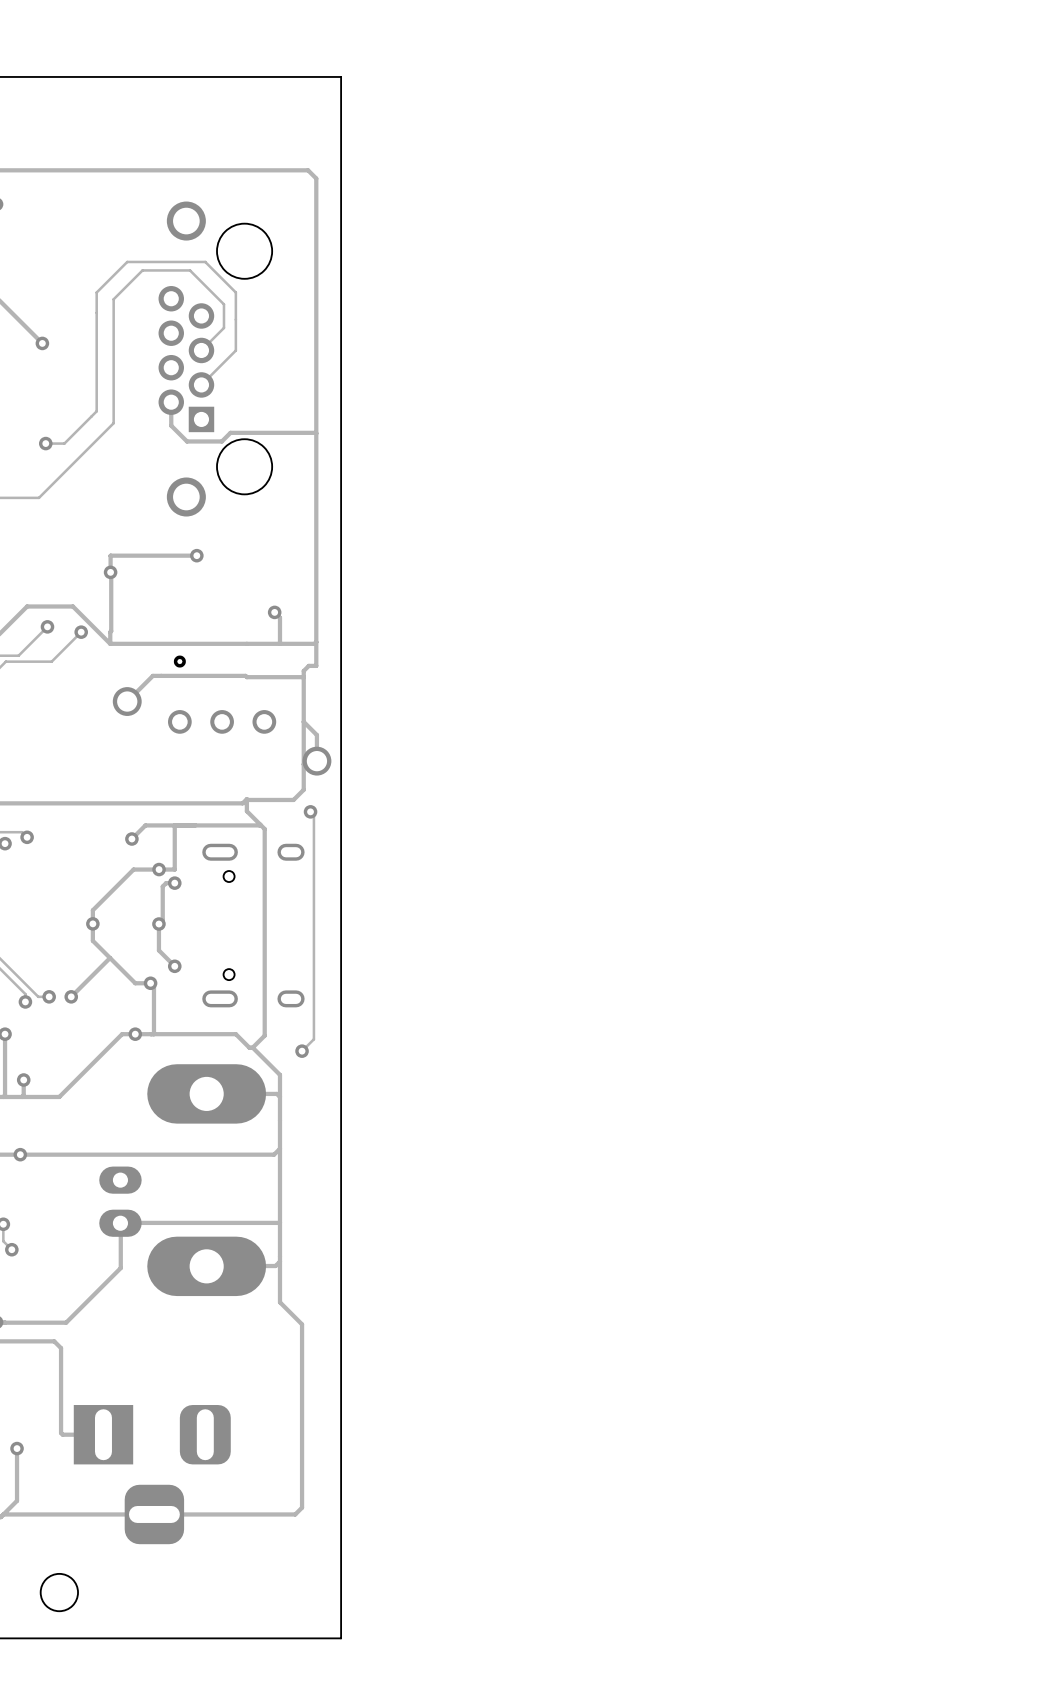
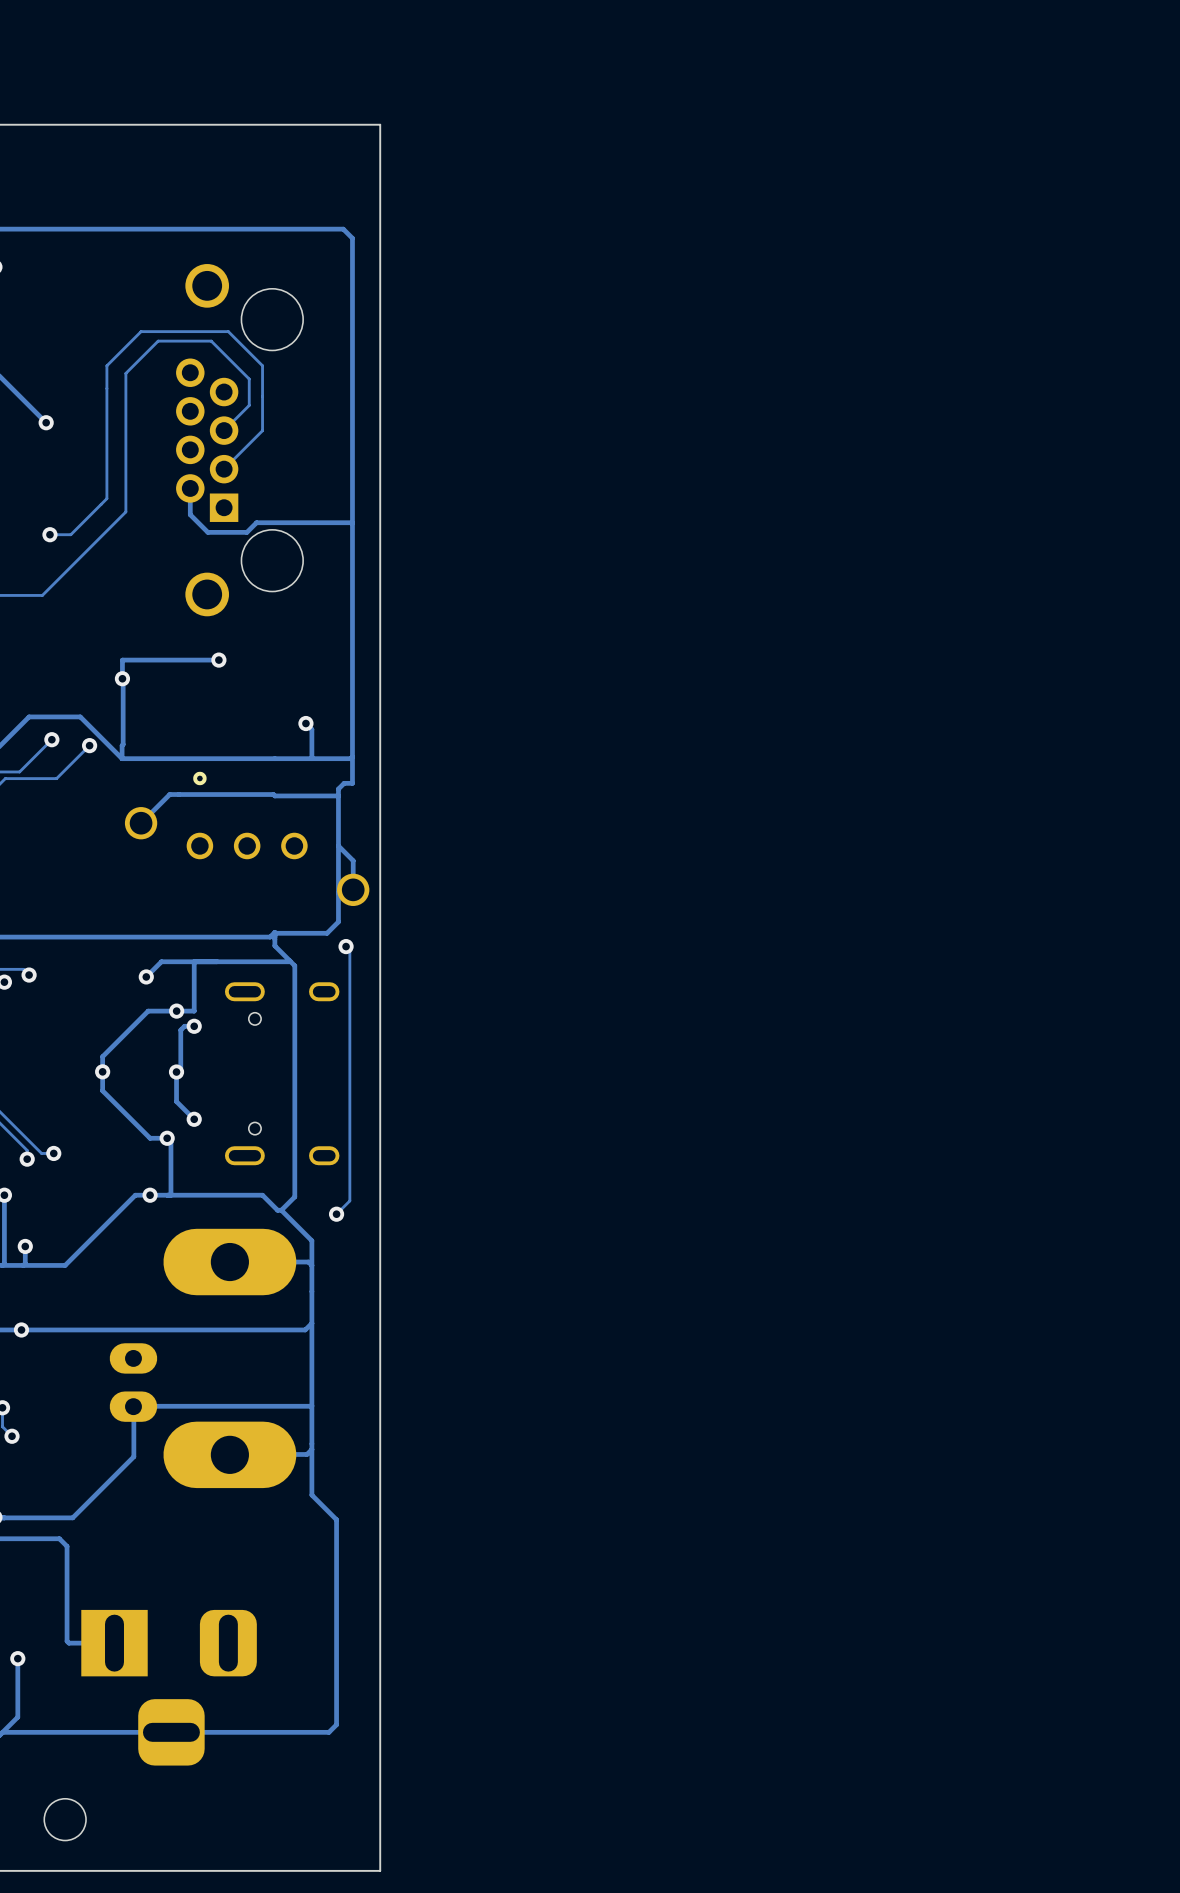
track: (110, 958) (71, 996) -> none
via: (71, 996) -> none

